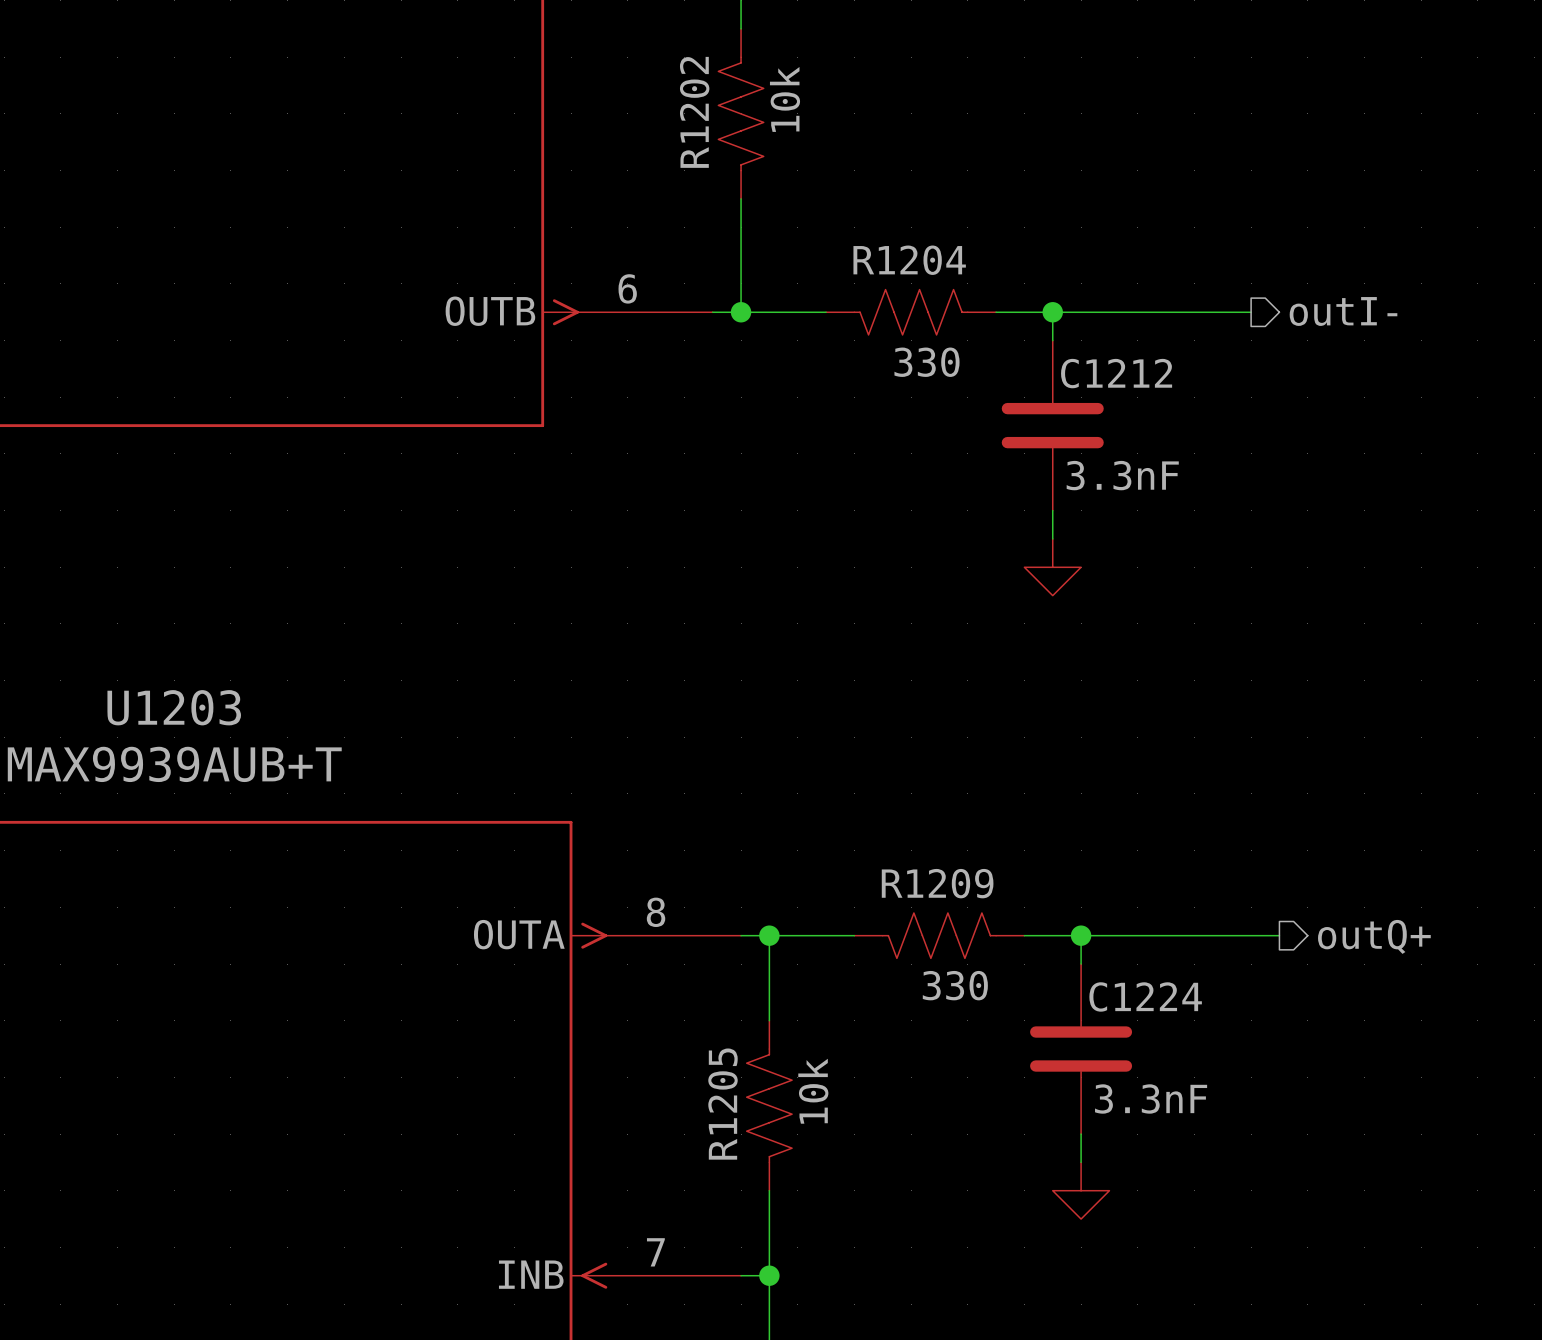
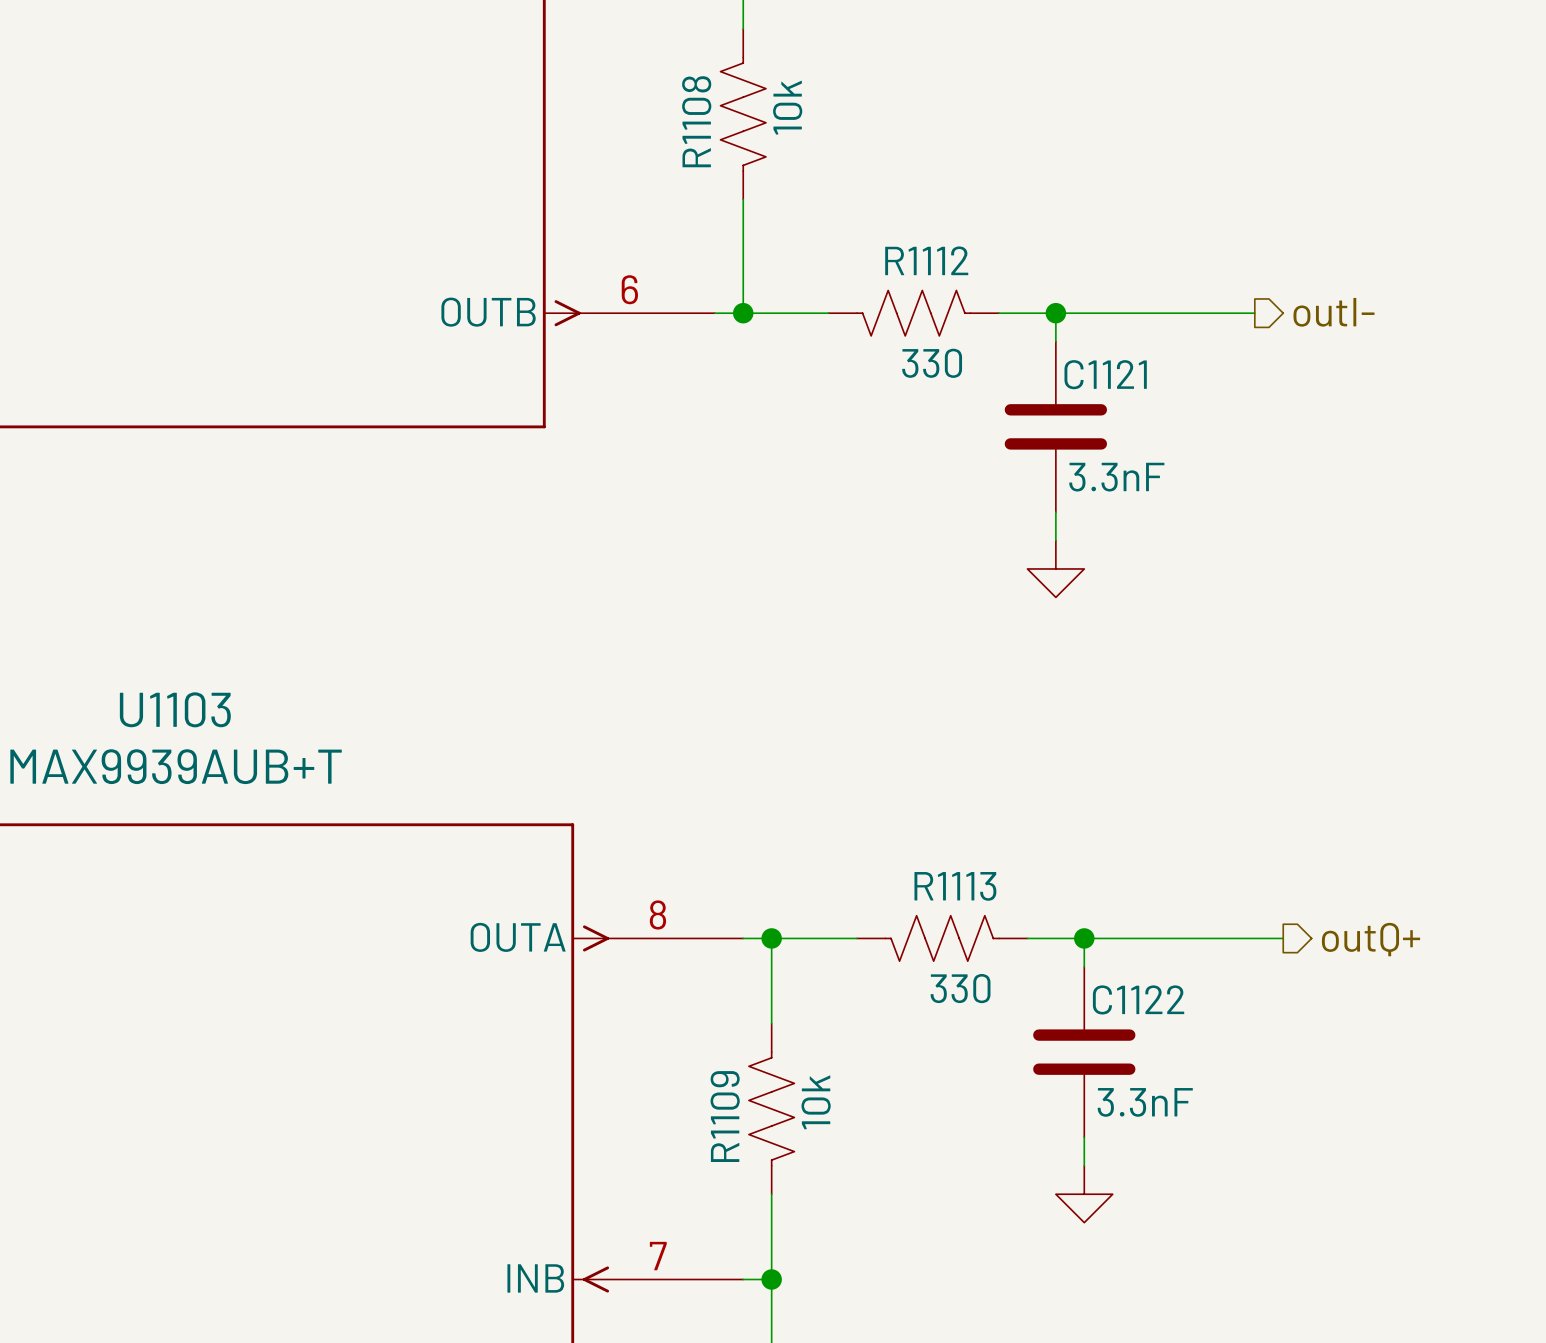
R1202 name: R1202 (694, 112) -> R1108 (696, 121)
R1204 name: R1204 (909, 260) -> R1112 (926, 260)
C1212 name: C1212 (1116, 373) -> C1121 (1105, 374)
U1203 name: U1203 (174, 707) -> U1103 (175, 709)
R1209 name: R1209 (937, 883) -> R1113 (955, 886)
C1224 name: C1224 (1145, 996) -> C1122 (1138, 999)
R1205 name: R1205 (723, 1104) -> R1109 (725, 1116)

